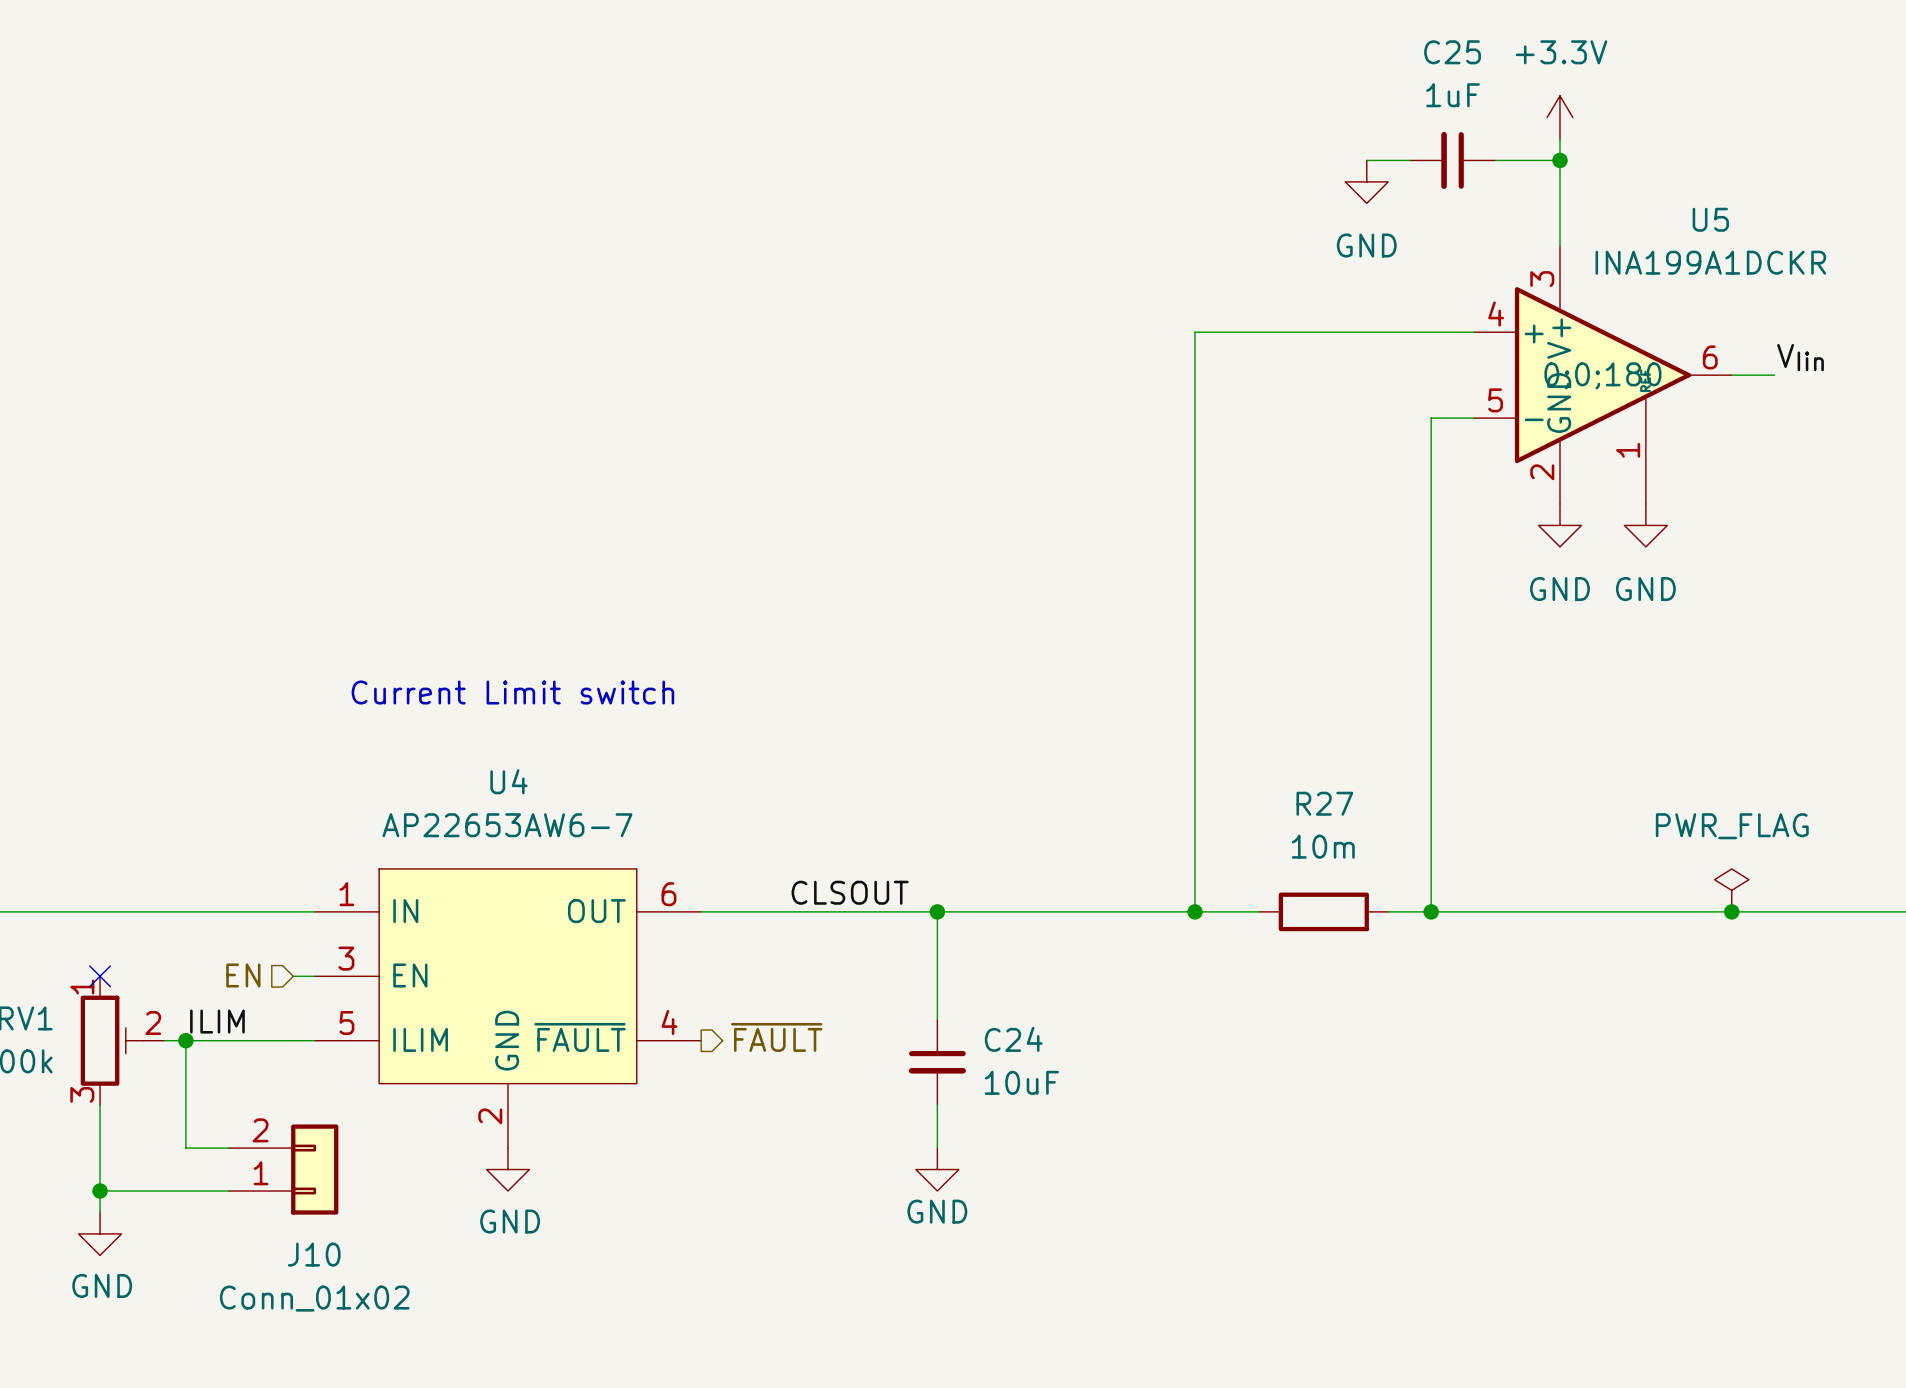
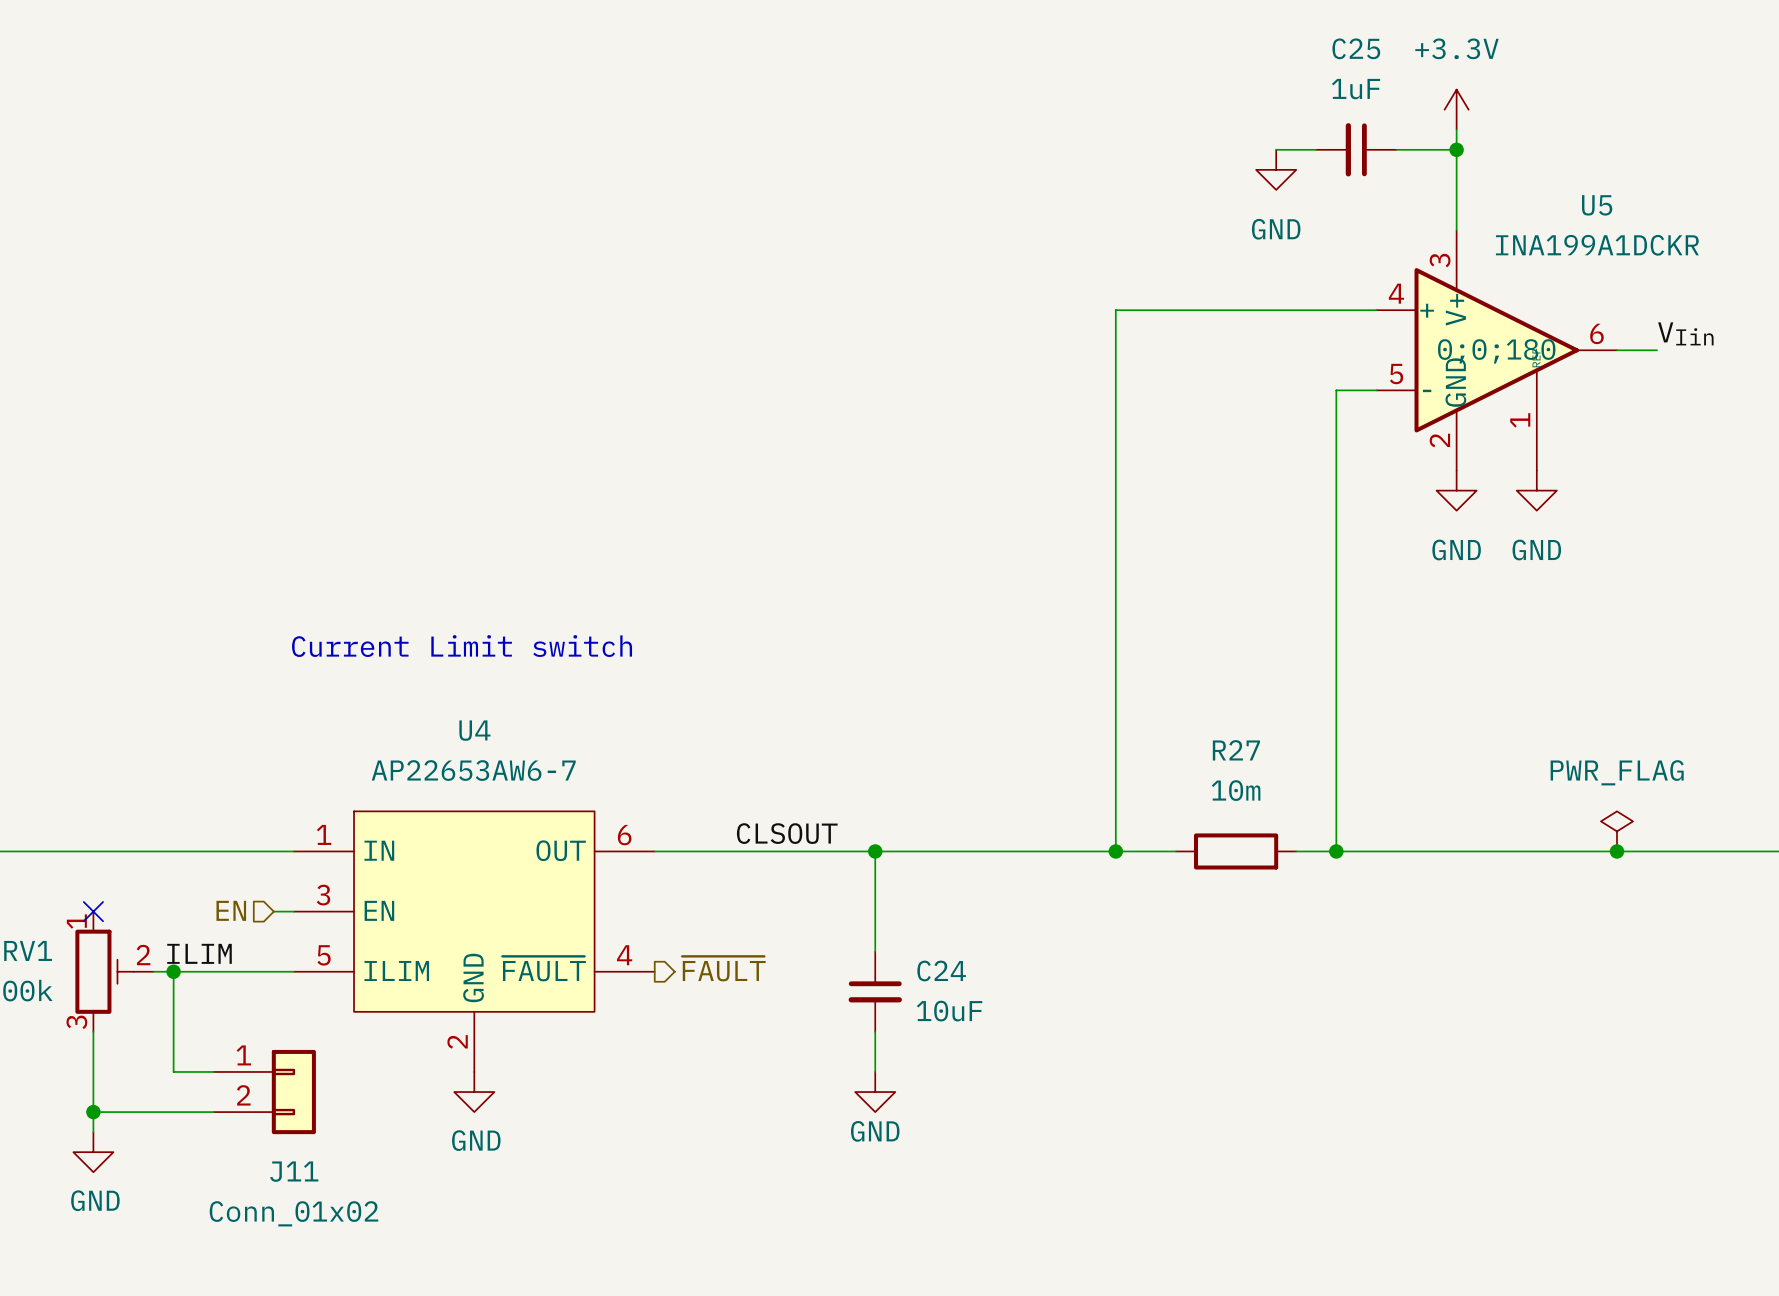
J10 flip: as is (314, 1169) -> up-down (293, 1092)
J10 name: J10 (314, 1254) -> J11 (294, 1171)

